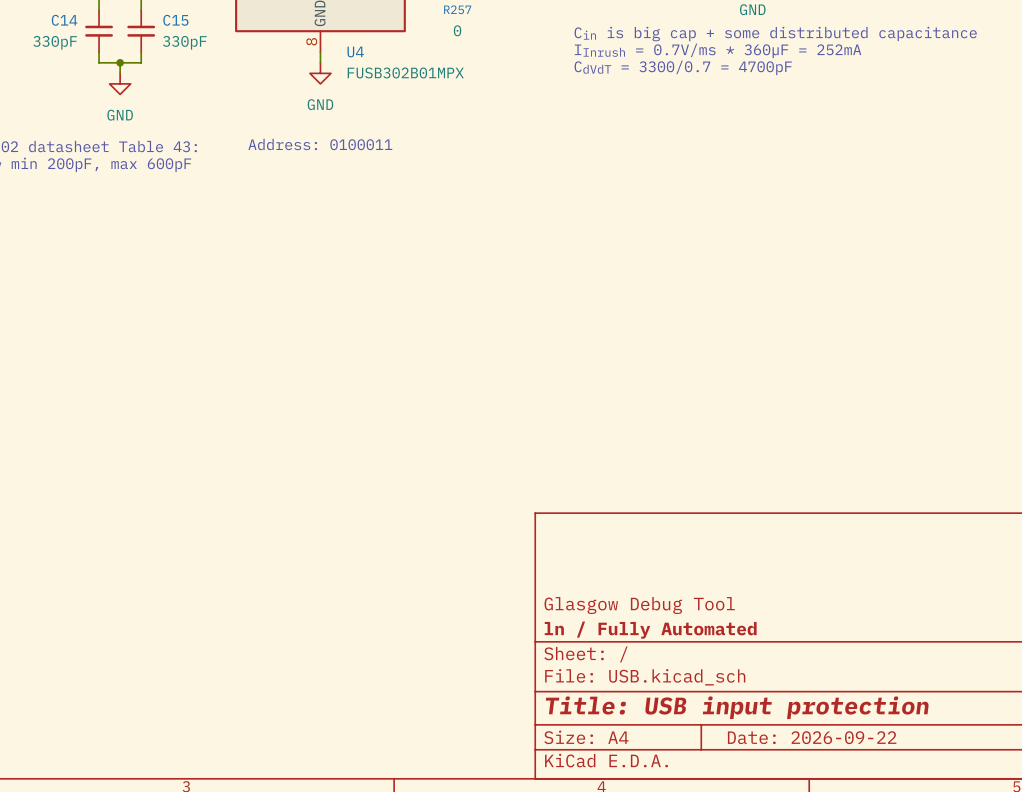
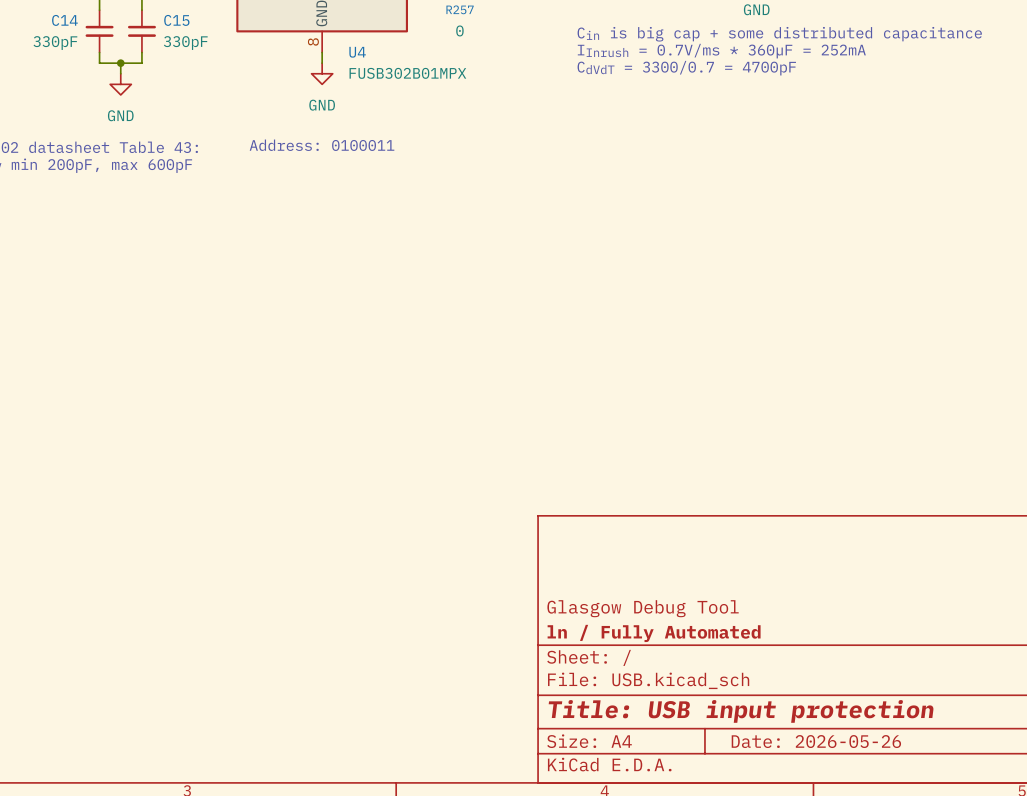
title block: Date: 2026-09-22 (812, 737) -> Date: 2026-05-26 (816, 741)

